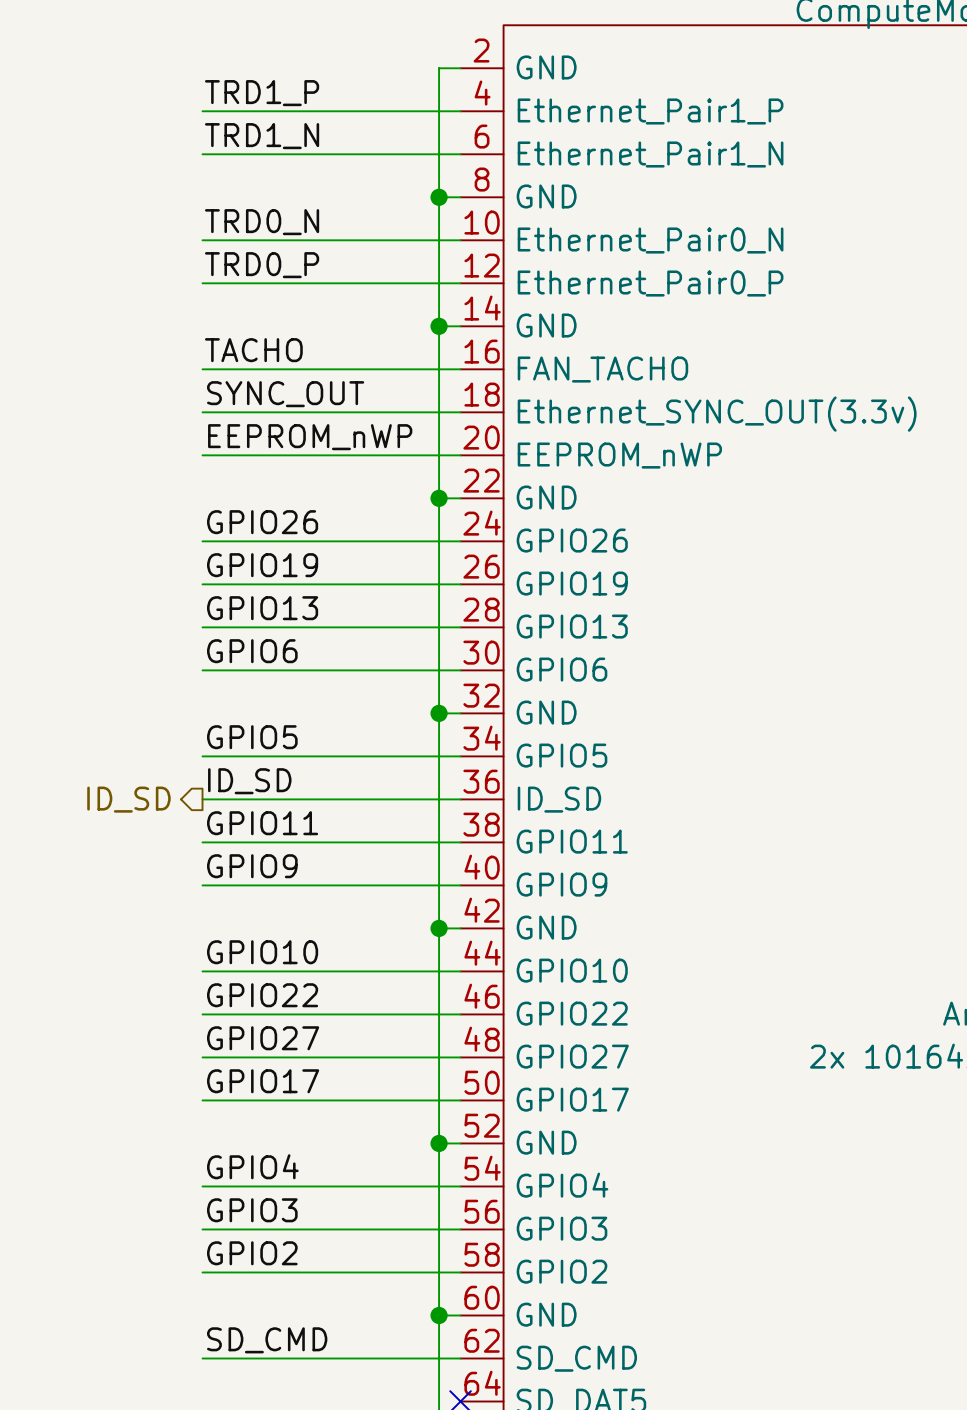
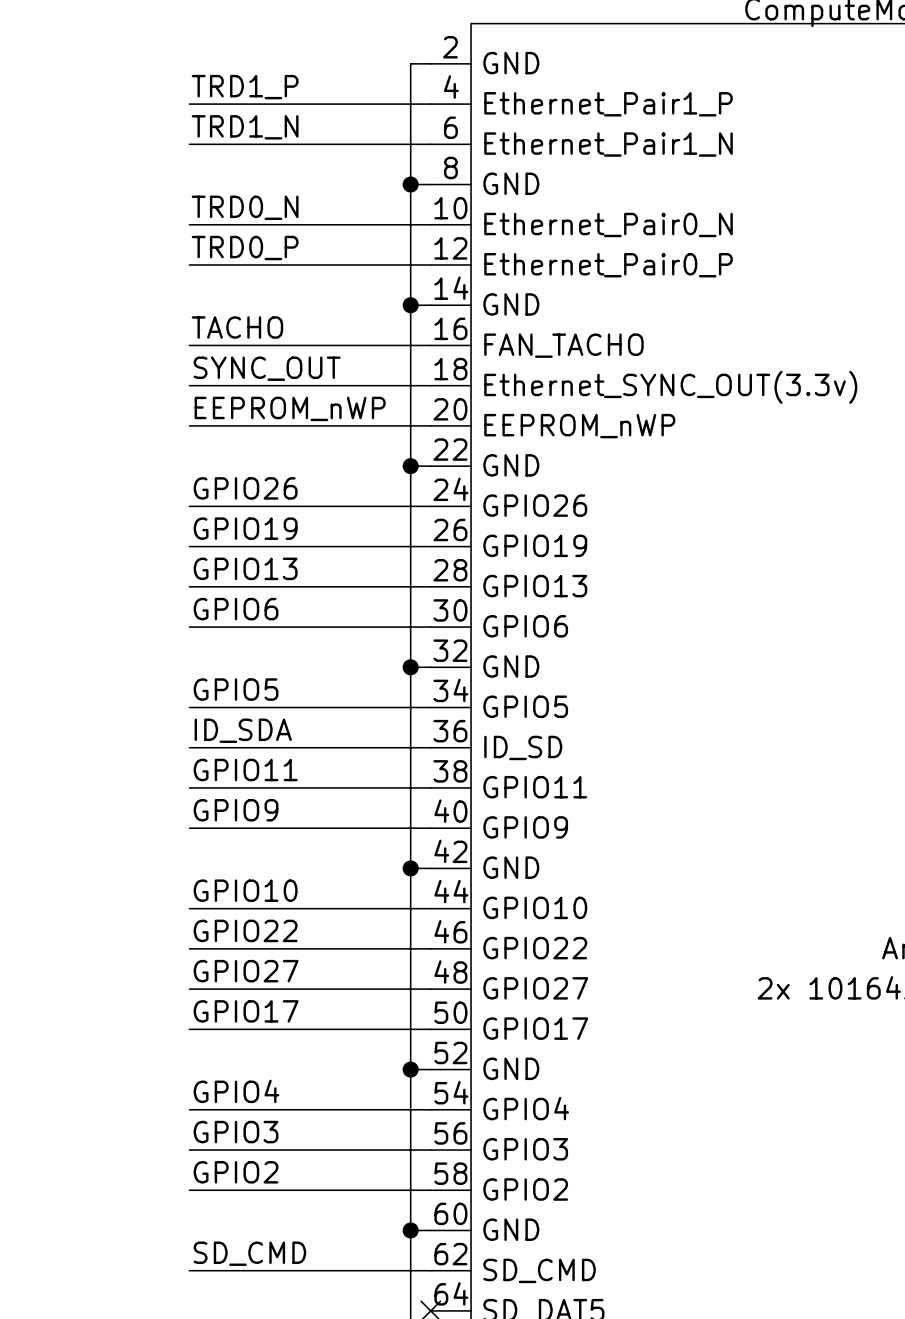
label: ID_SD (249, 781) -> ID_SDA (243, 730)
hierarchical label: ID_SD (128, 799) -> none

